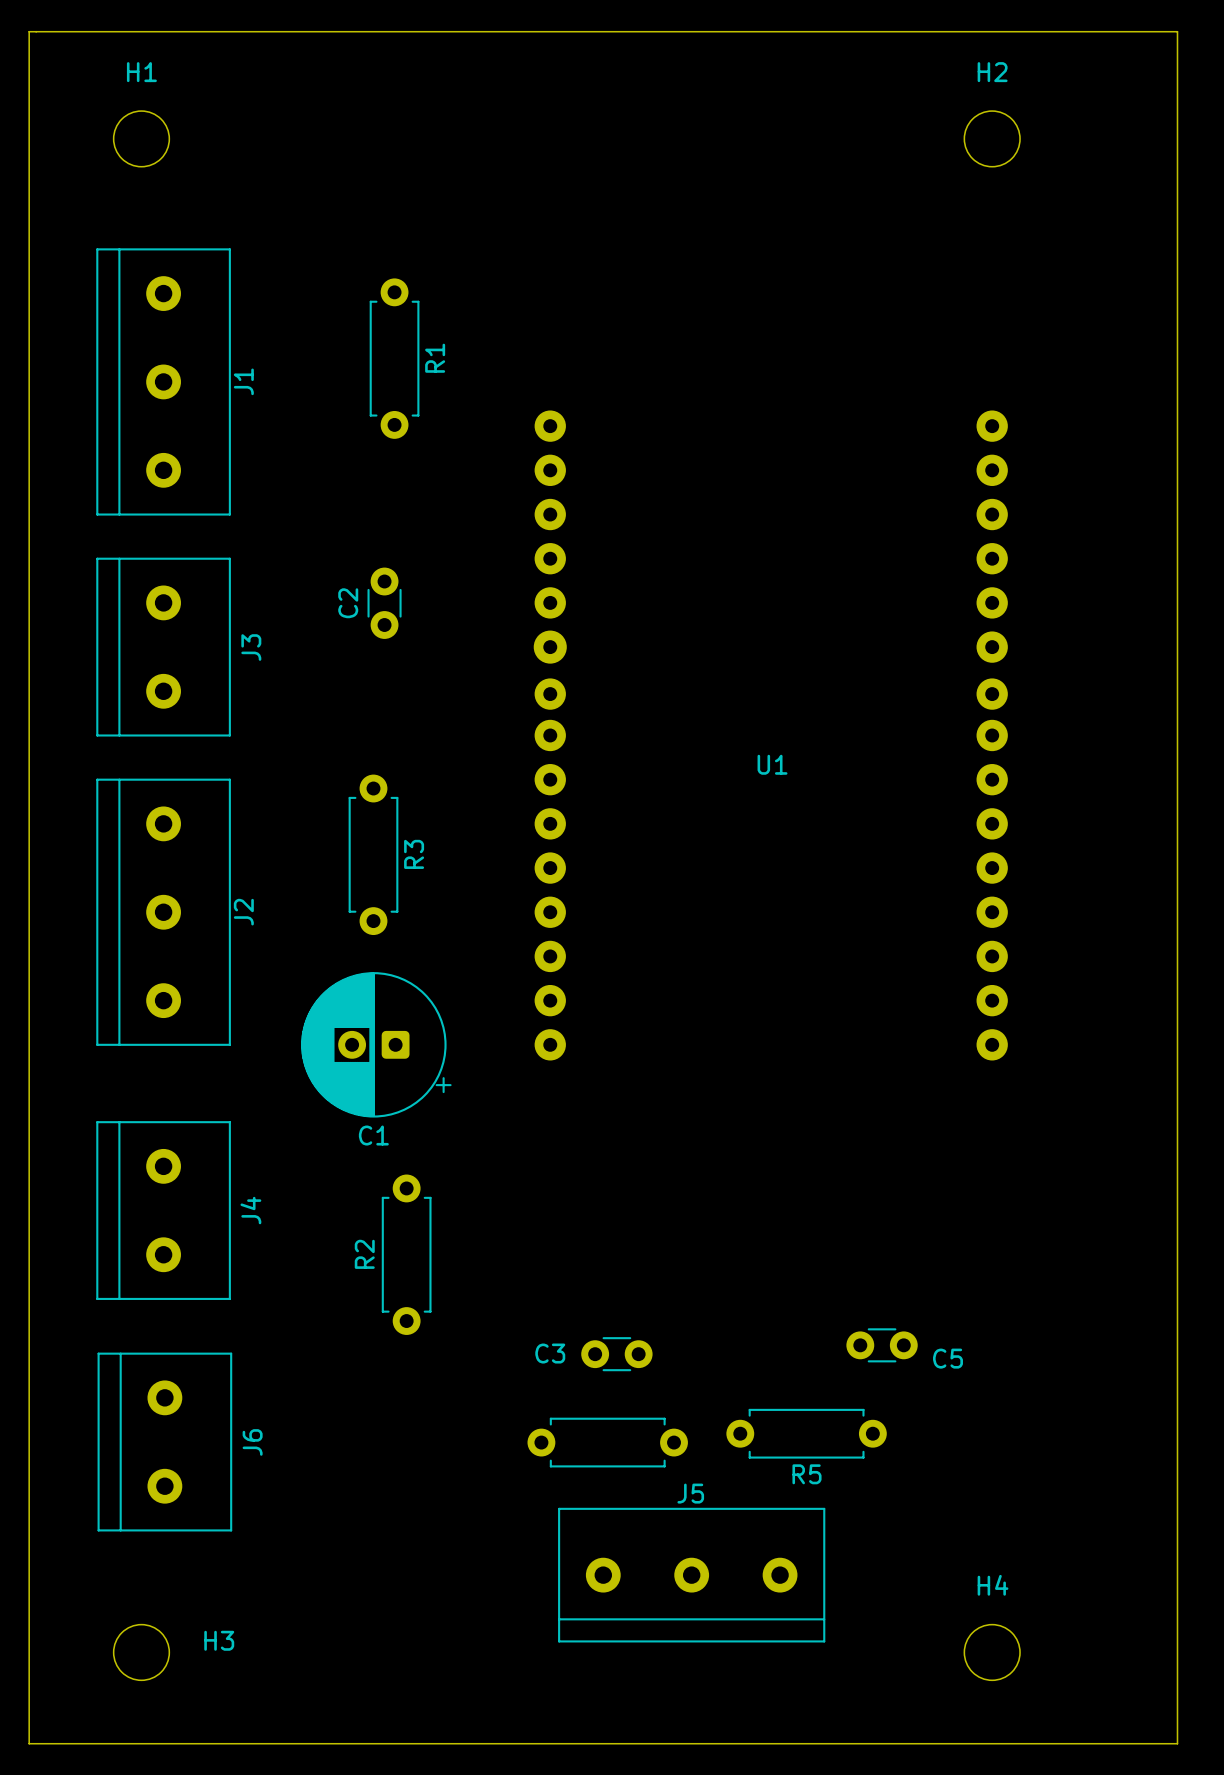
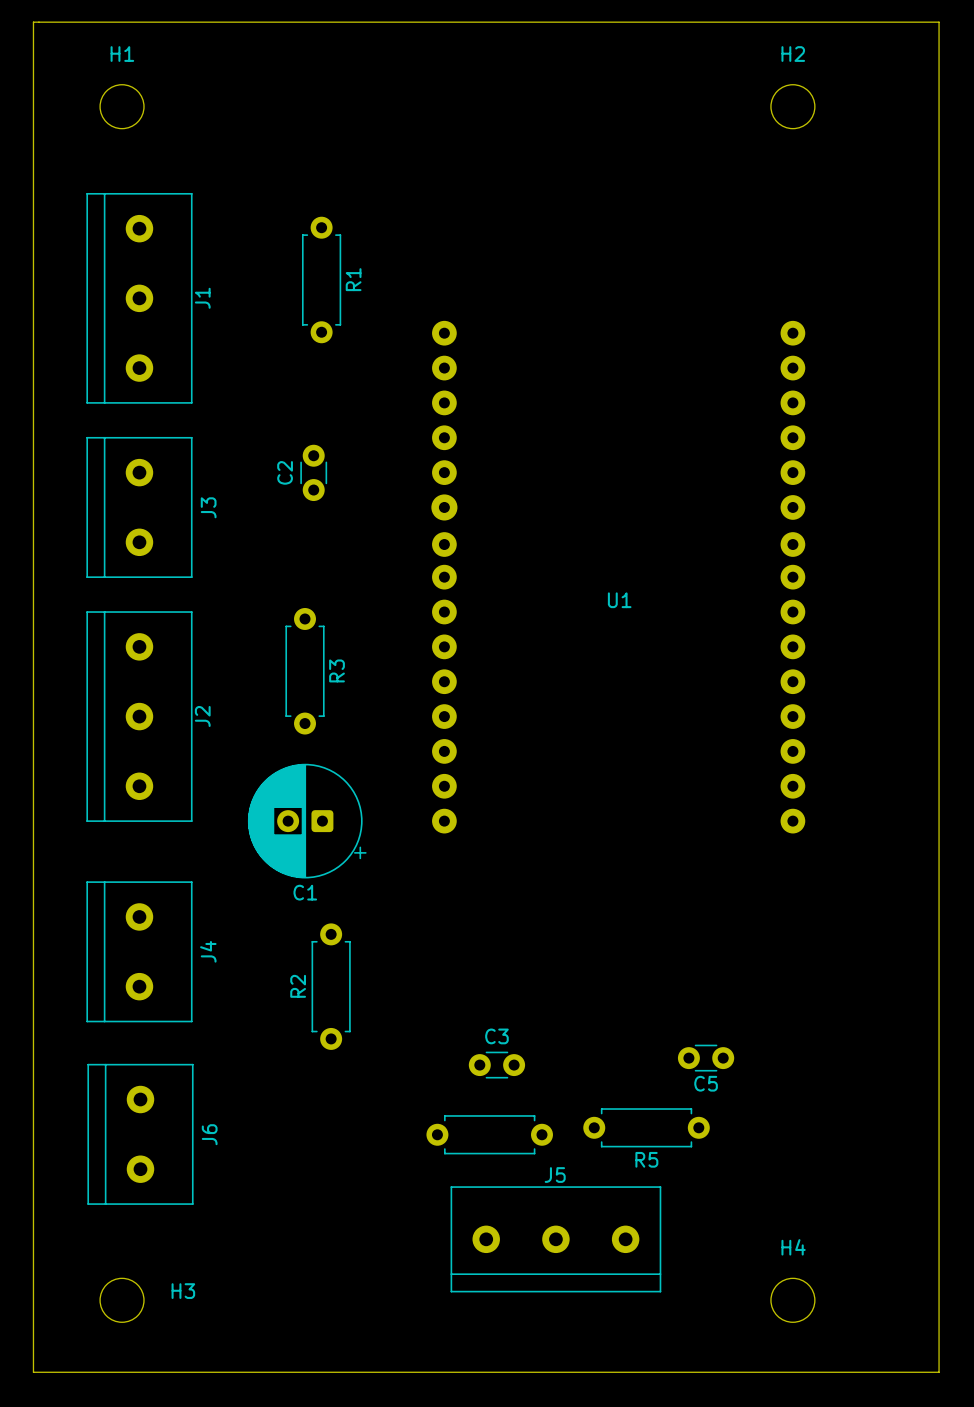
C3 name position: C3 (550, 1353) -> C3 (496, 1036)
C5 name position: C5 (948, 1358) -> C5 (706, 1083)

